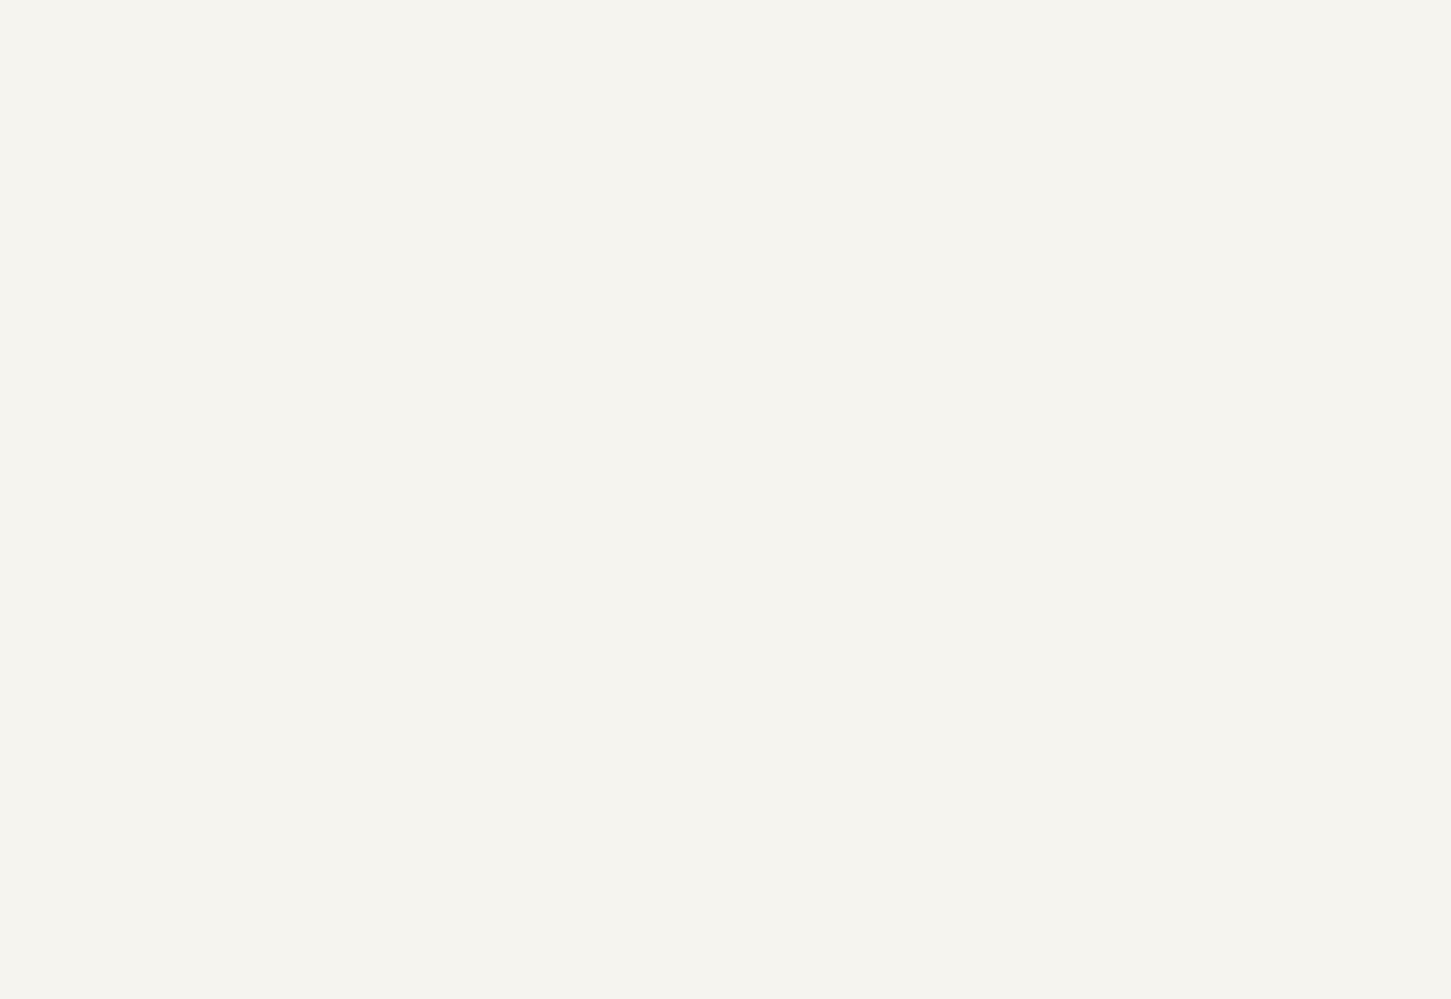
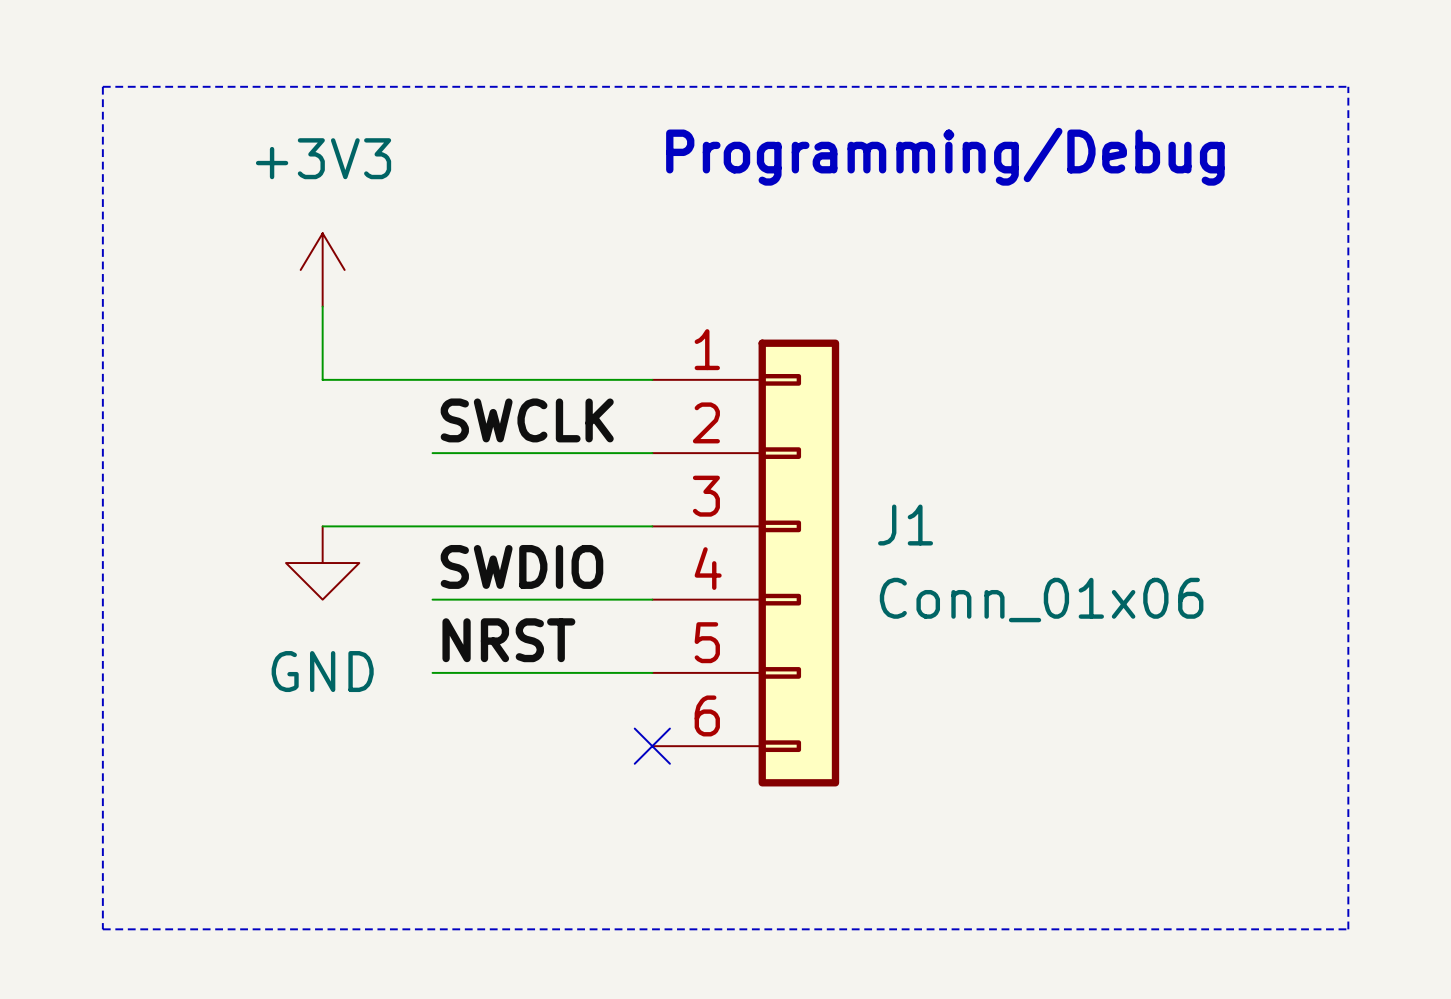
line: none -> (102, 86) (102, 929) (1348, 929) (1348, 86) (102, 86)
text: none -> Programming/Debug (945, 156)
power symbol: none -> +3V3 (322, 269)
wire: none -> (322, 306) (322, 379) (652, 379)
label: none -> SWCLK (527, 420)
wire: none -> (432, 453) (652, 453)
wire: none -> (322, 526) (652, 526)
power symbol: none -> GND (322, 563)
J1: none -> Conn_01x06 (745, 563)
label: none -> SWDIO (521, 566)
wire: none -> (432, 599) (652, 599)
label: none -> NRST (508, 640)
wire: none -> (432, 672) (652, 672)
no-connect mark: none -> (652, 746)

